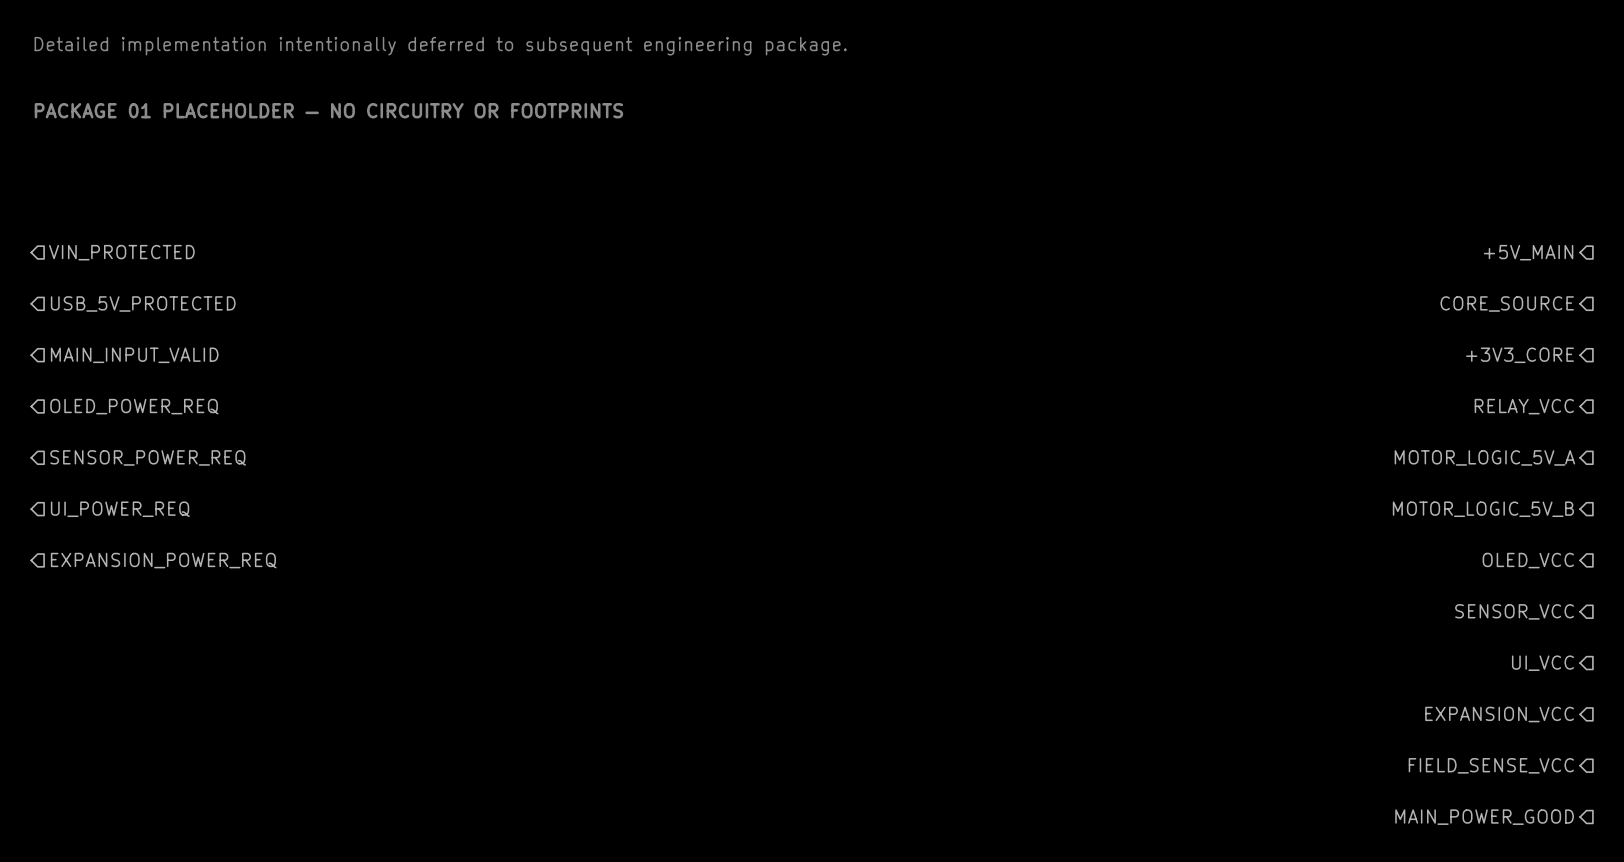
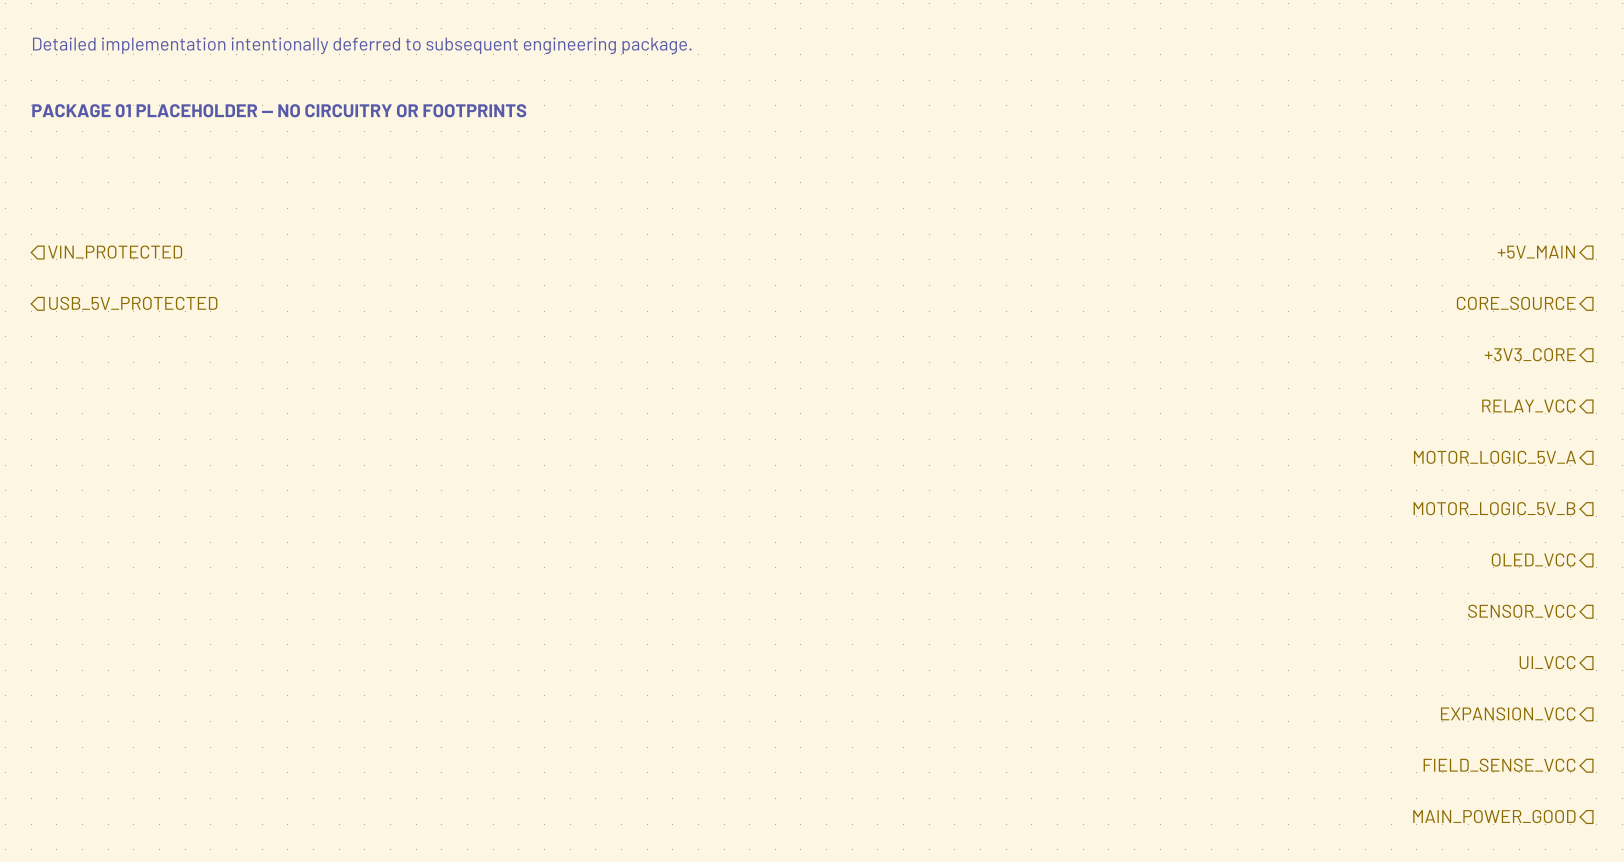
hierarchical label: MAIN_INPUT_VALID (134, 355) -> none
hierarchical label: OLED_POWER_REQ (134, 406) -> none
hierarchical label: SENSOR_POWER_REQ (148, 457) -> none
hierarchical label: UI_POWER_REQ (120, 509) -> none
hierarchical label: EXPANSION_POWER_REQ (163, 560) -> none

